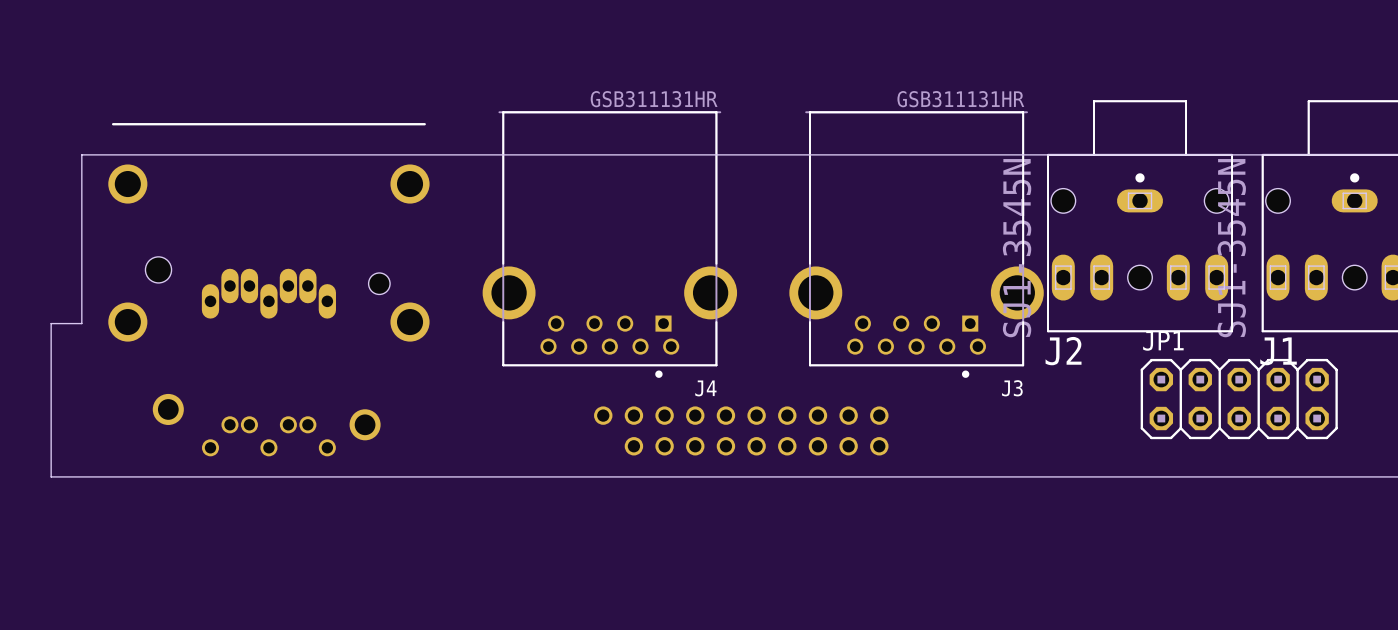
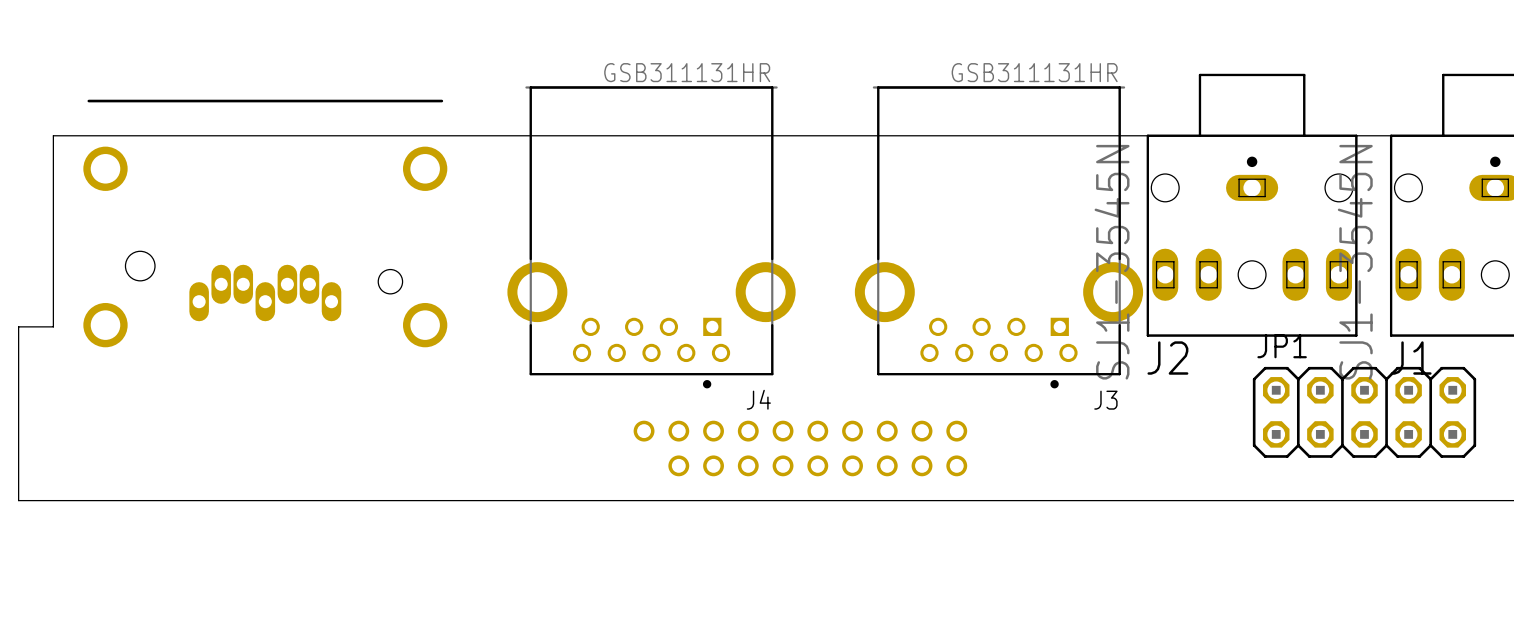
part: (266, 425) -> none

